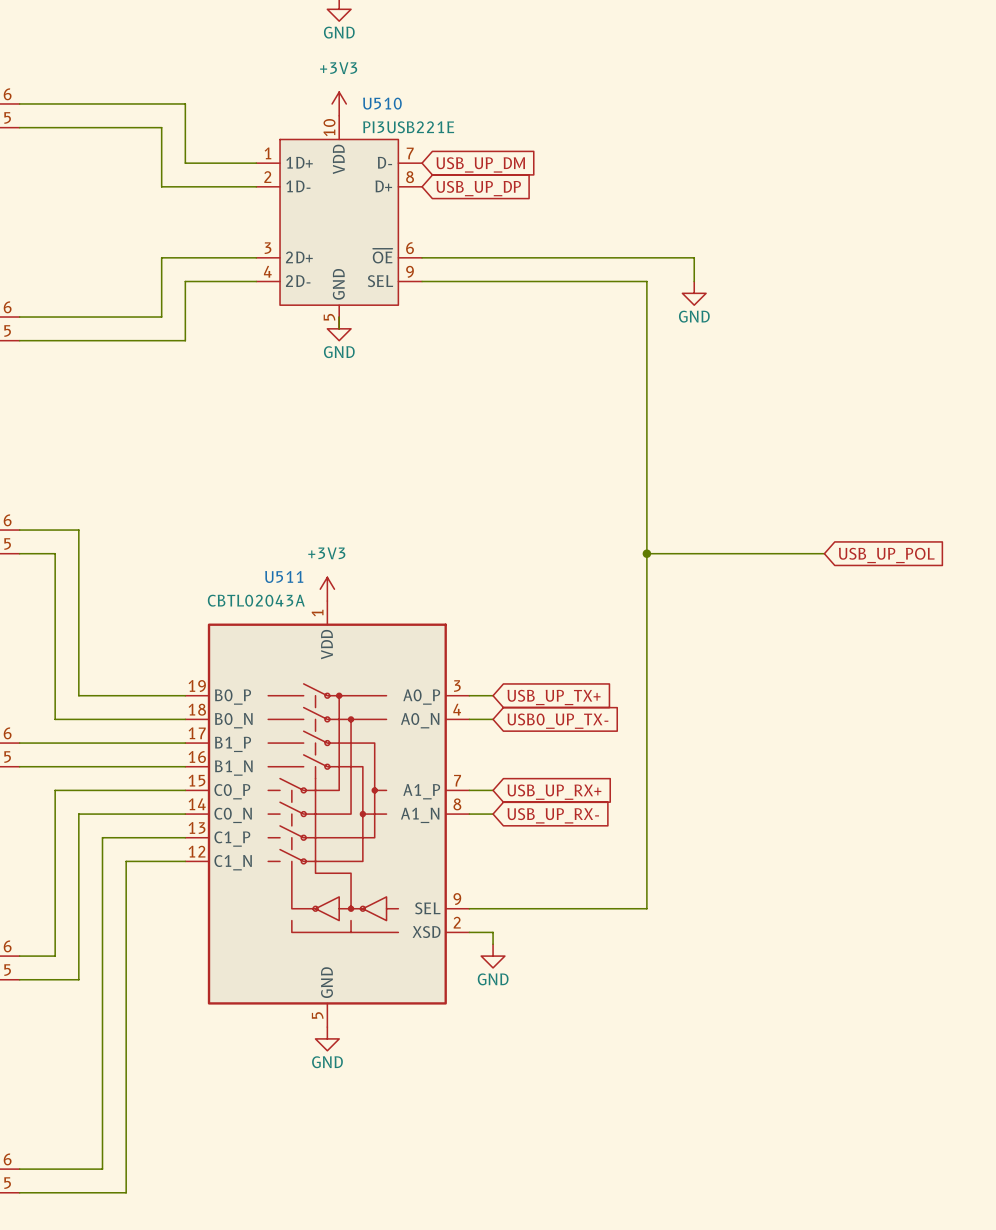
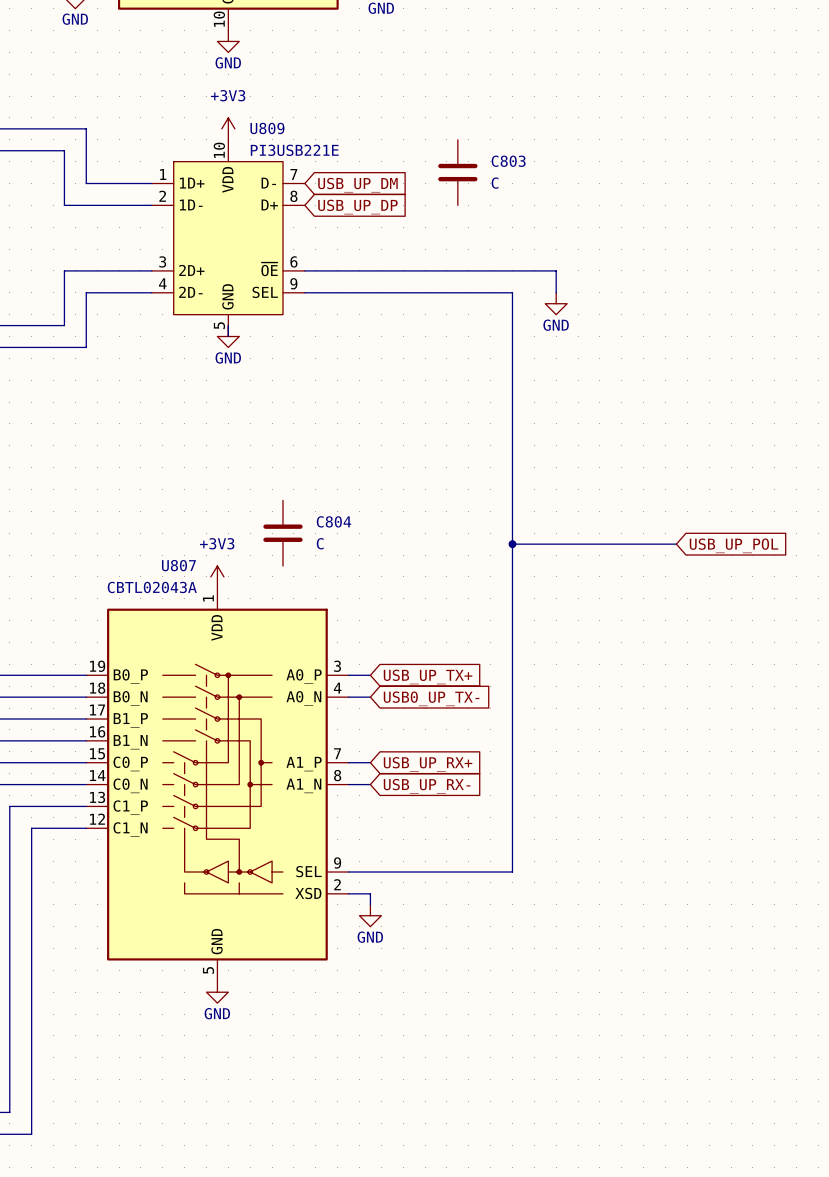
U510 name: U510 (382, 103) -> U809 (267, 128)
C803: none -> C (457, 172)
C804: none -> C (282, 533)
U511 name: U511 (284, 576) -> U807 (178, 565)

